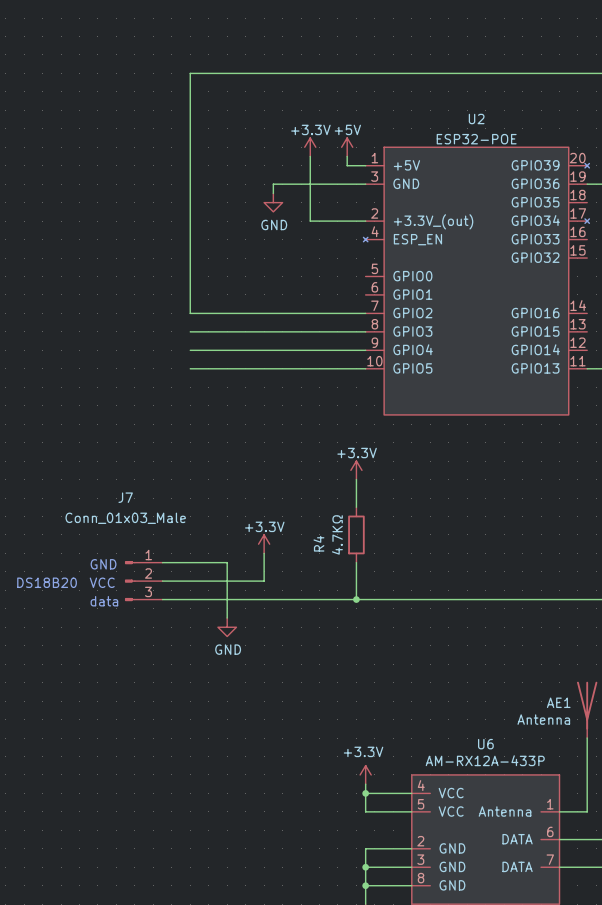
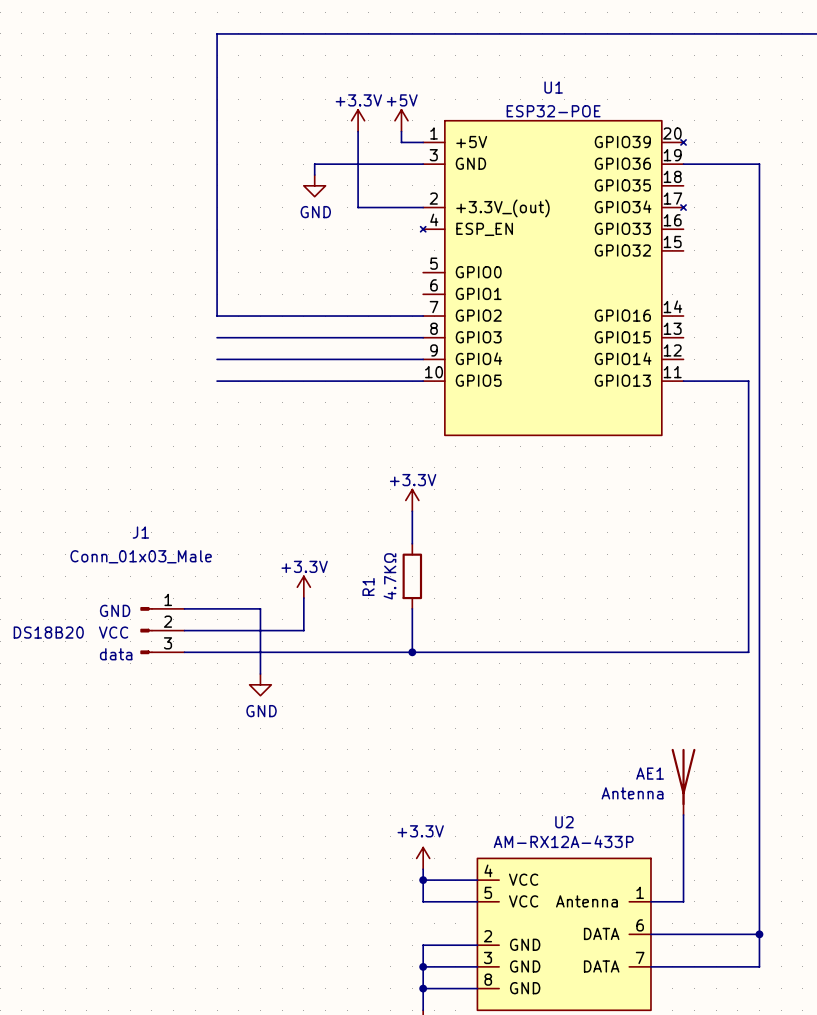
U2 name: U2 (476, 119) -> U1 (553, 87)
J7 name: J7 (125, 497) -> J1 (140, 532)
R4 name: R4 (318, 543) -> R1 (368, 586)
U6 name: U6 (485, 744) -> U2 (564, 822)

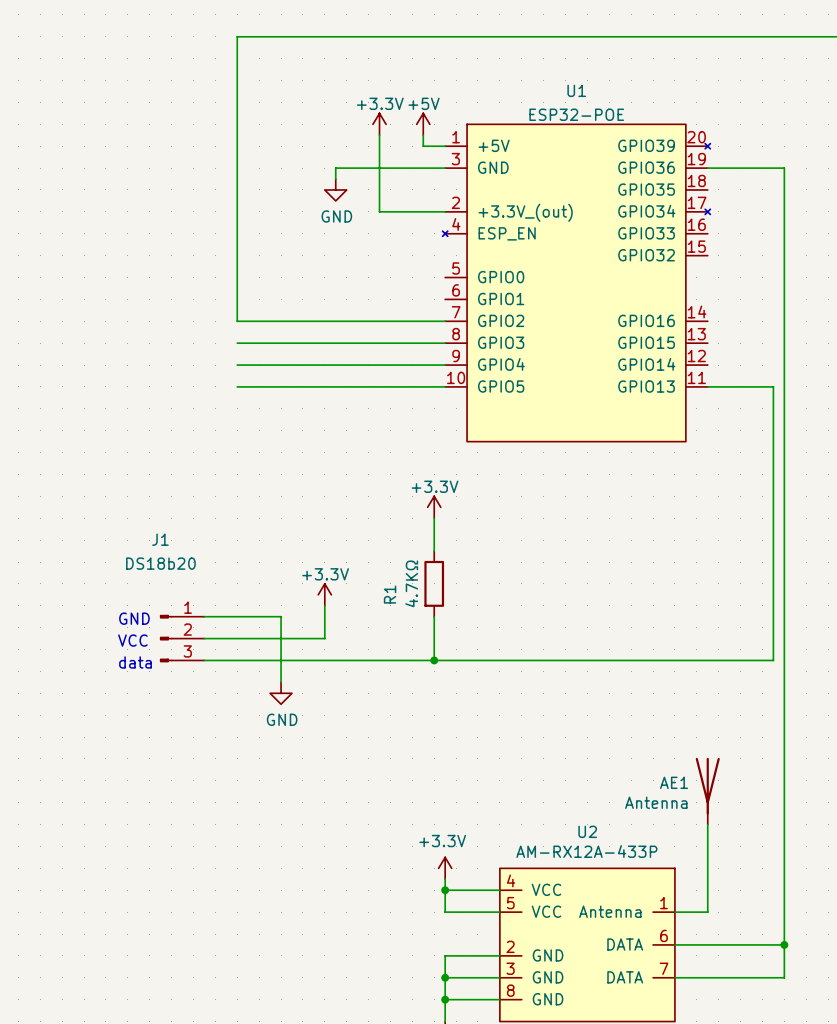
J1 value: Conn_01x03_Male (141, 556) -> DS18b20 (160, 563)
text: DS18B20 (48, 632) -> none

